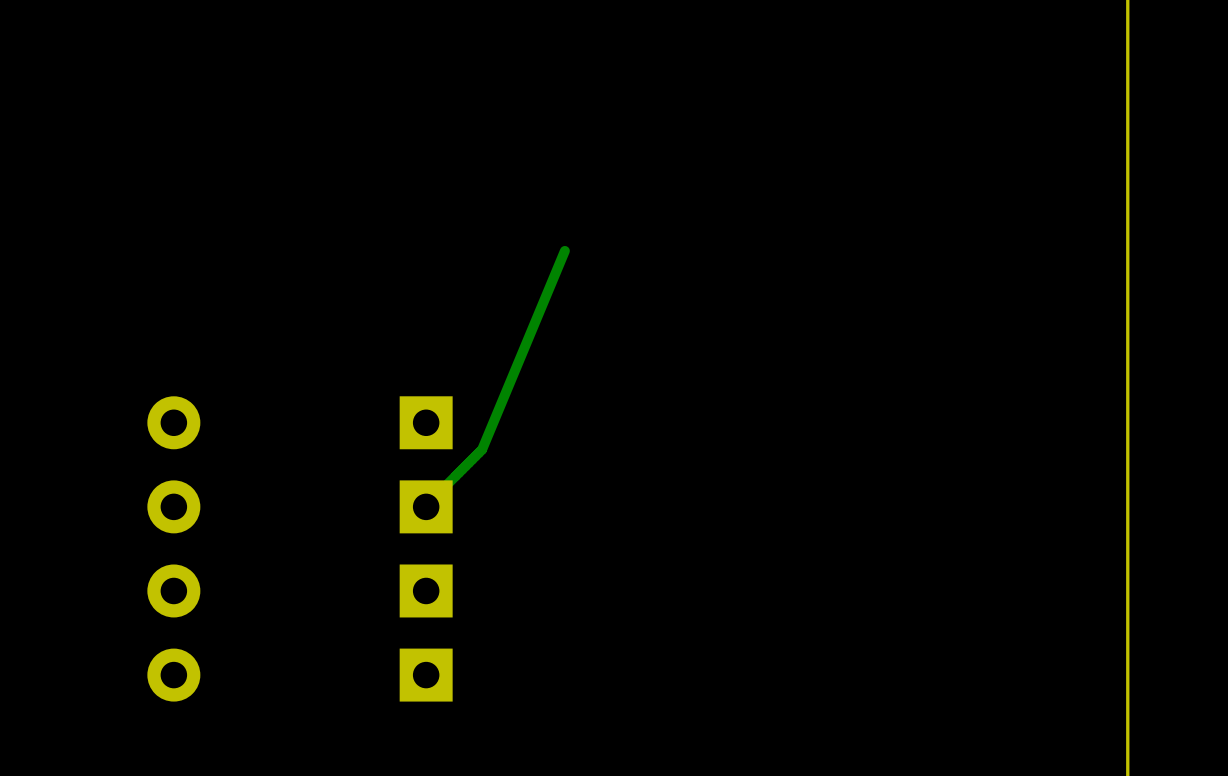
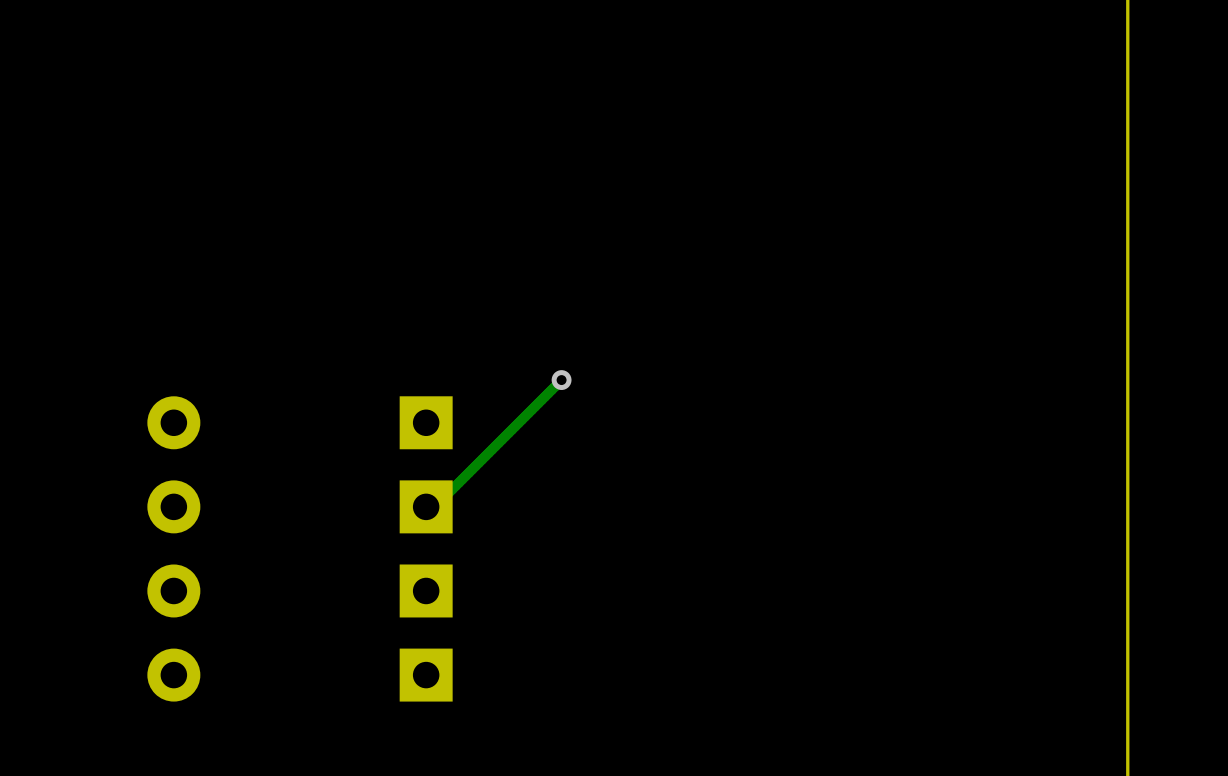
track: (564, 250) (482, 449) (425, 505) -> (561, 380) (435, 505) (425, 505)
via: none -> (561, 380)

